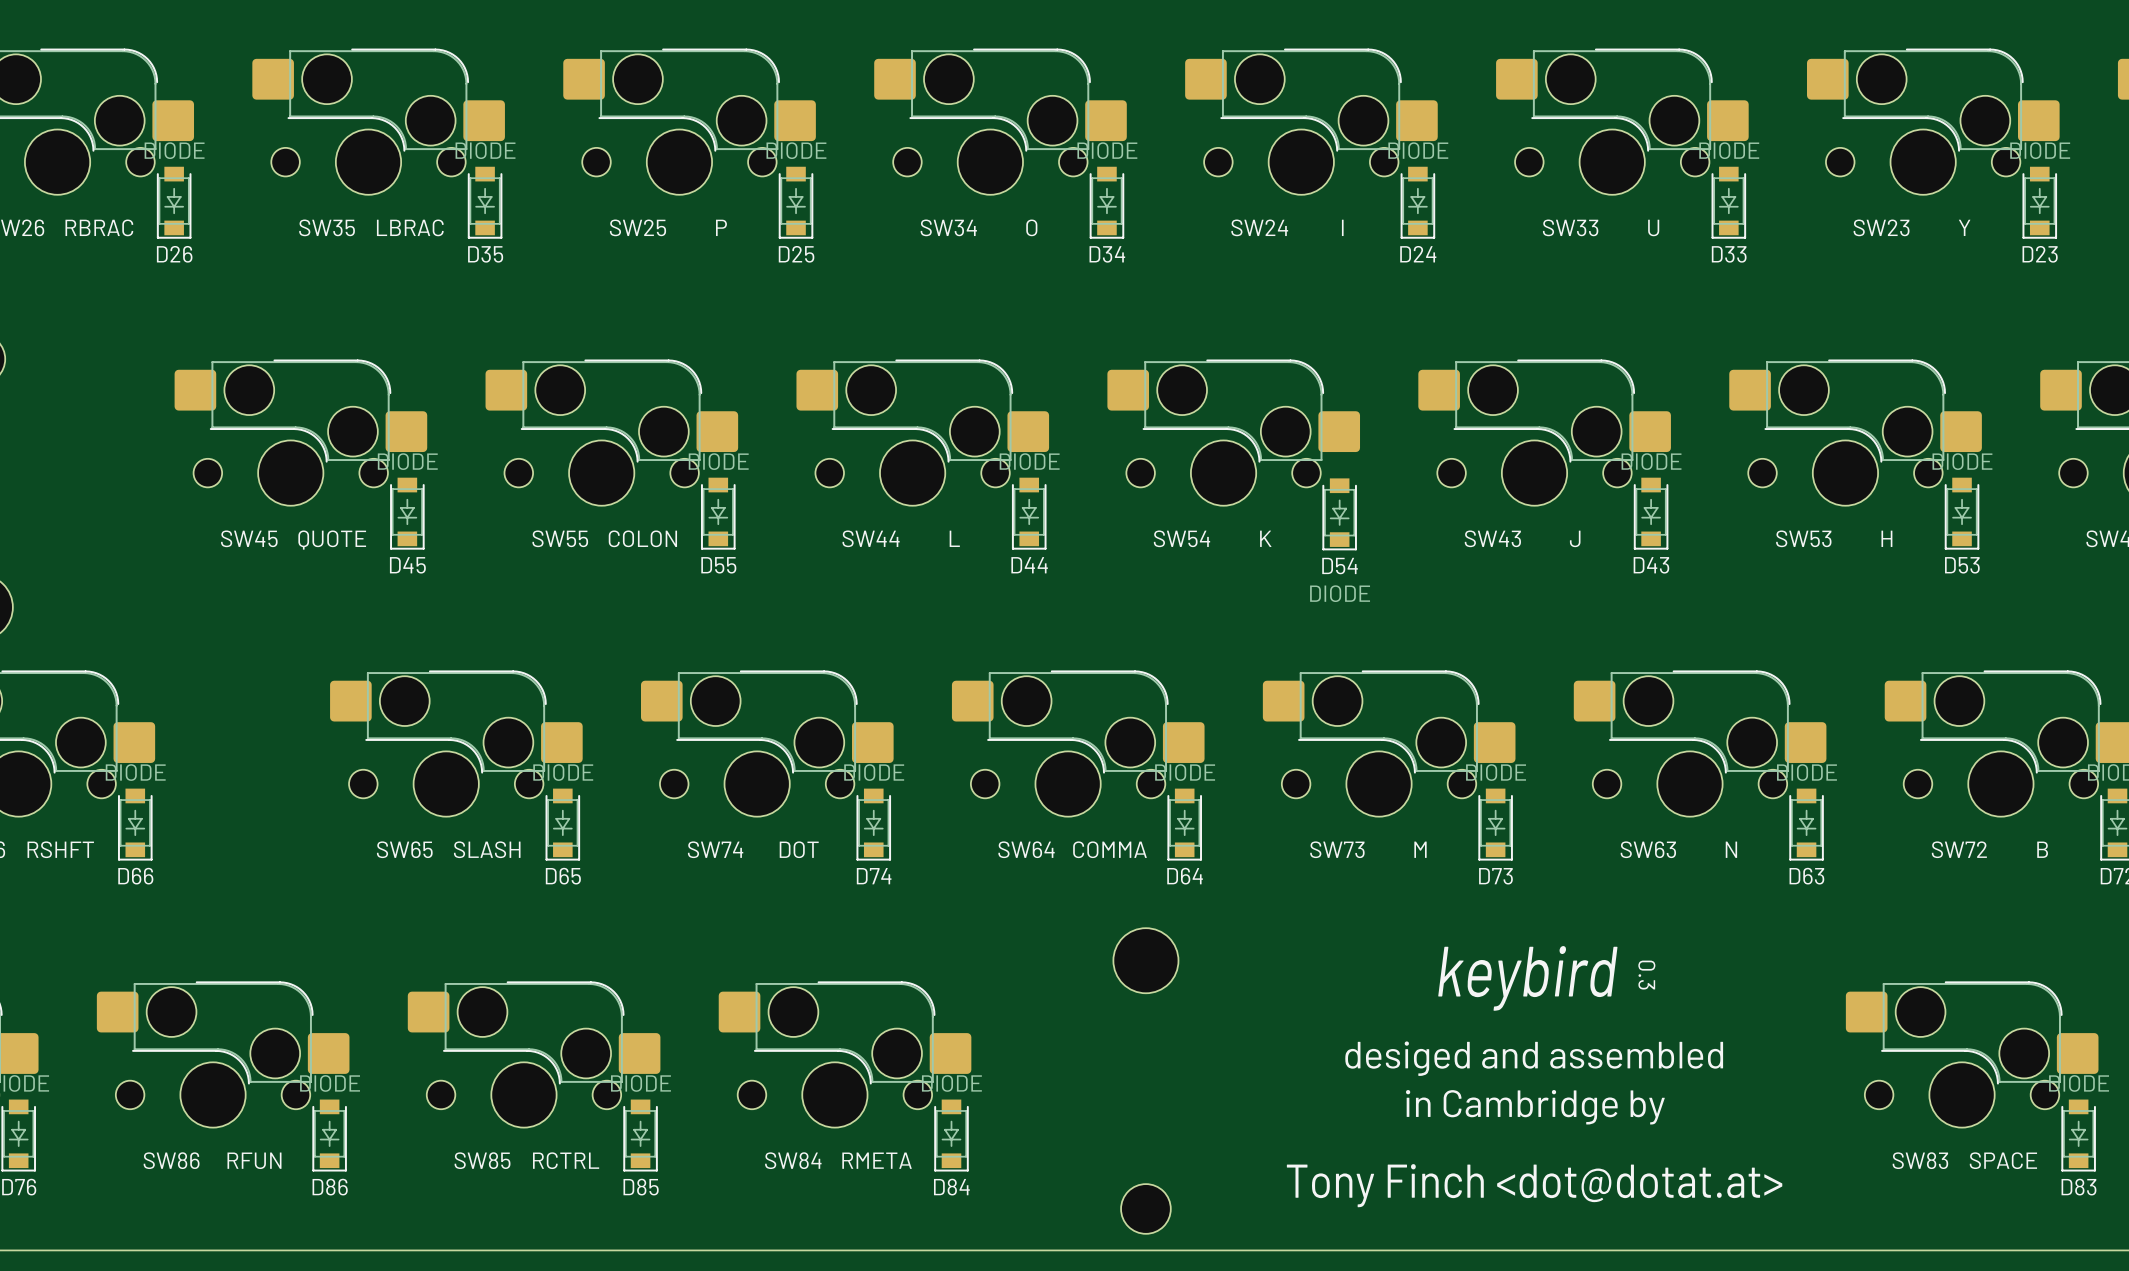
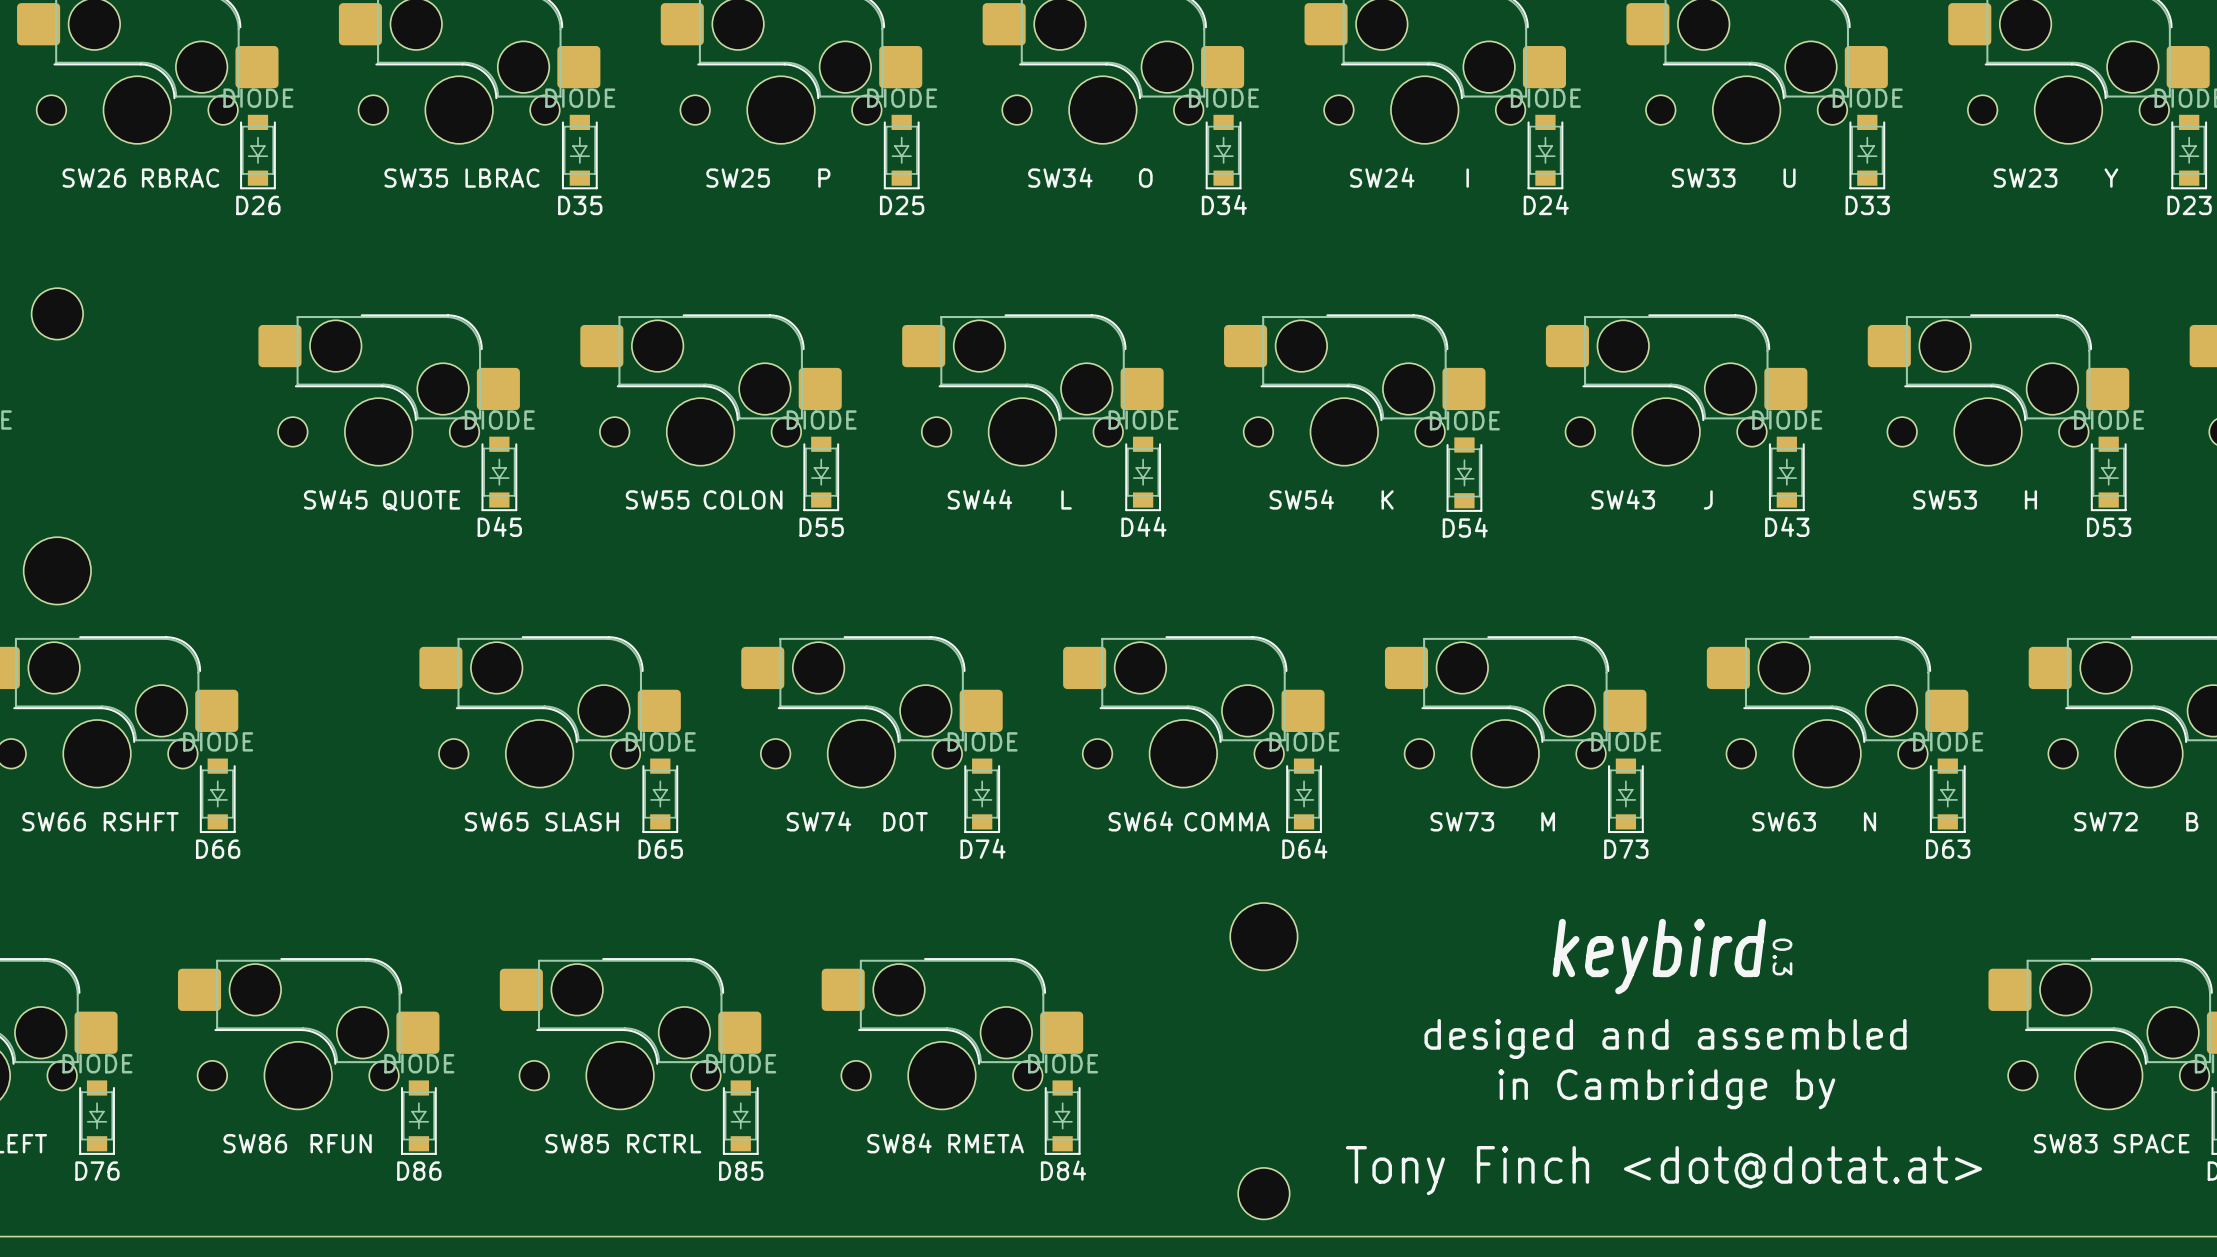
D54 value position: DIODE (1340, 593) -> DIODE (1464, 420)

